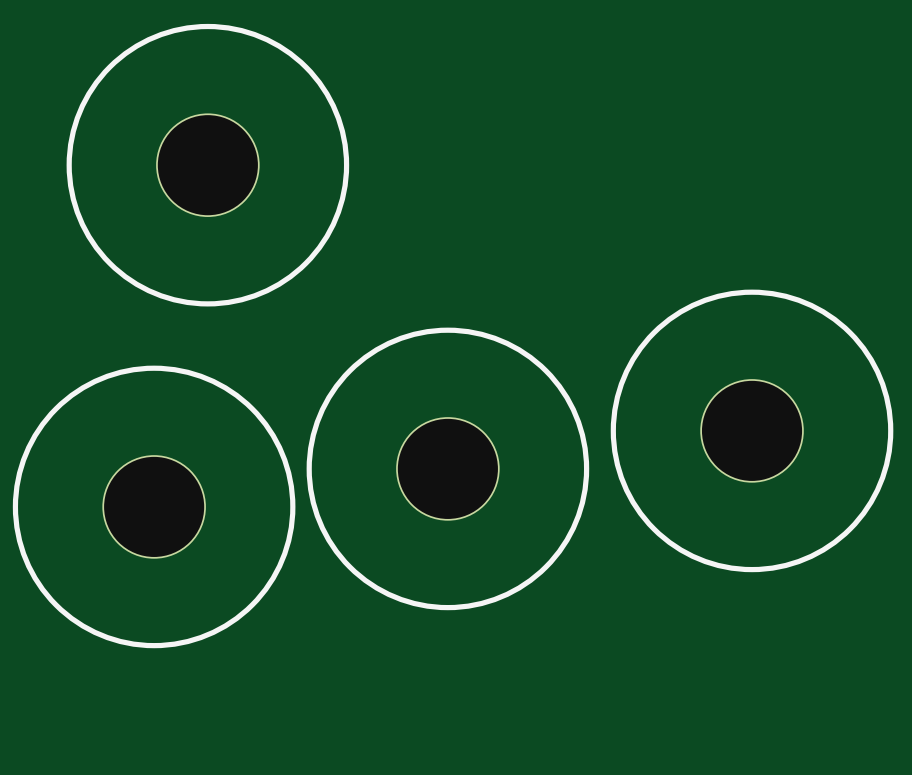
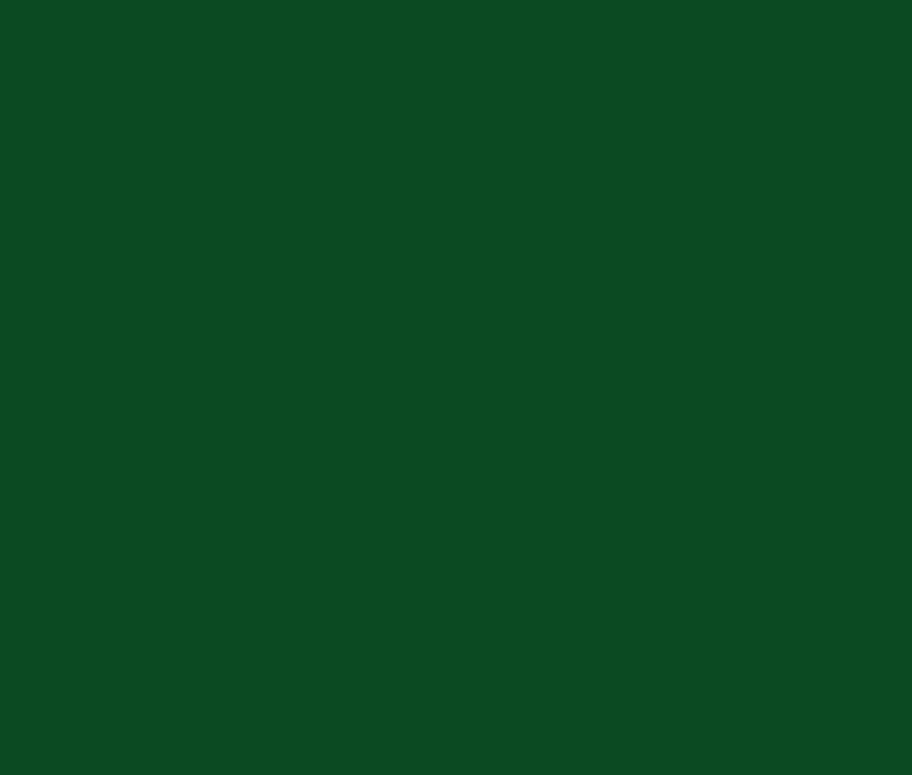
part: (207, 165) -> none
part: (752, 430) -> none
part: (447, 468) -> none
part: (154, 506) -> none

